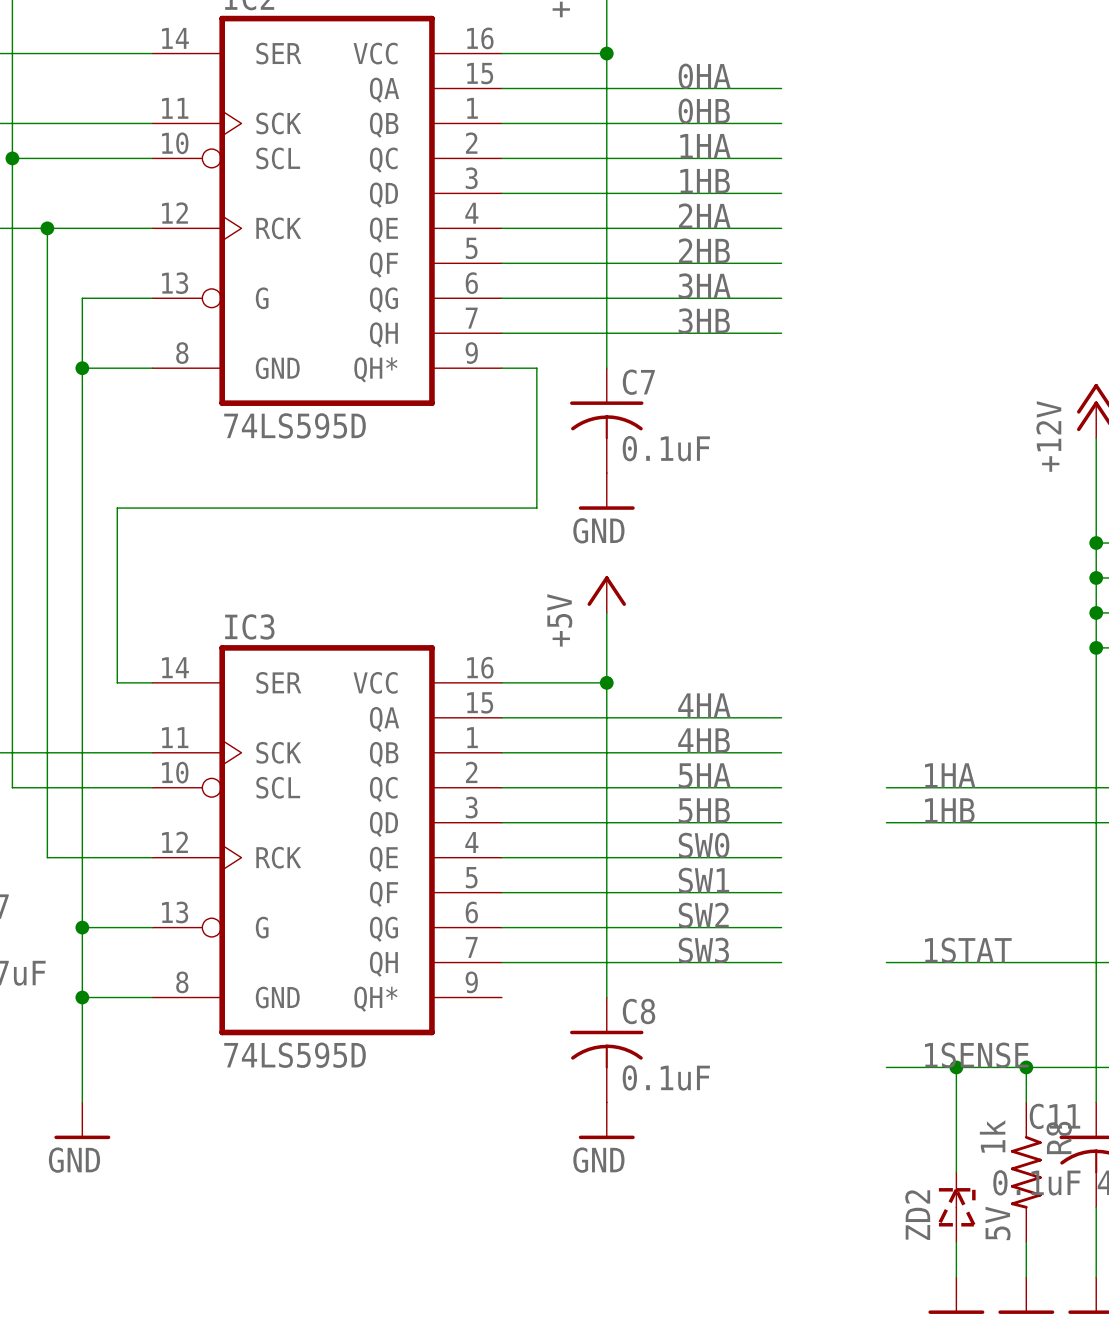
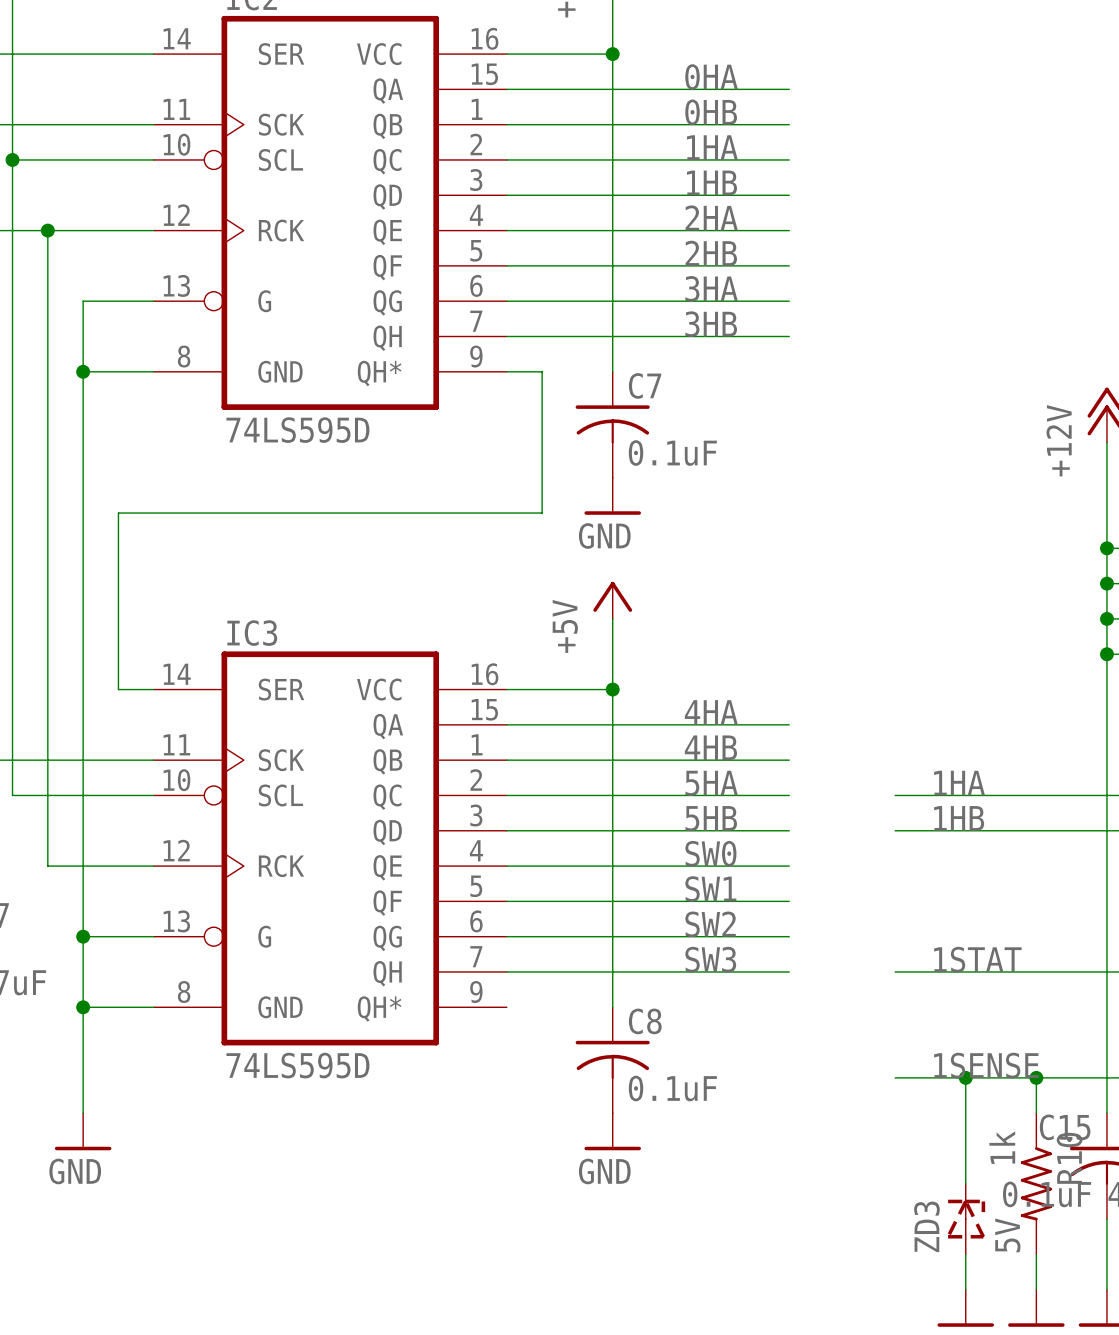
C11 name: C11 (1054, 1116) -> C15 (1065, 1127)
R8 name: R8 (1059, 1137) -> R10 (1069, 1158)
ZD2 name: ZD2 (917, 1215) -> ZD3 (926, 1226)

